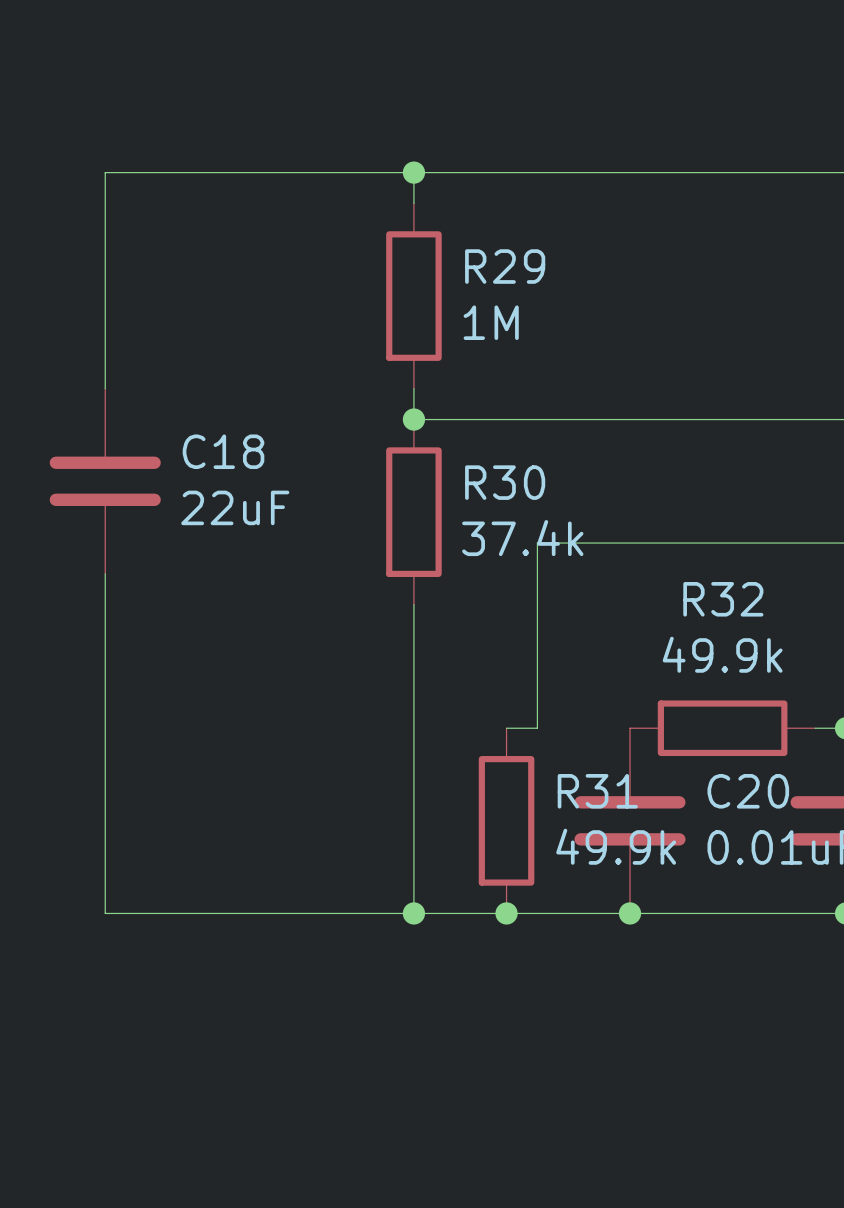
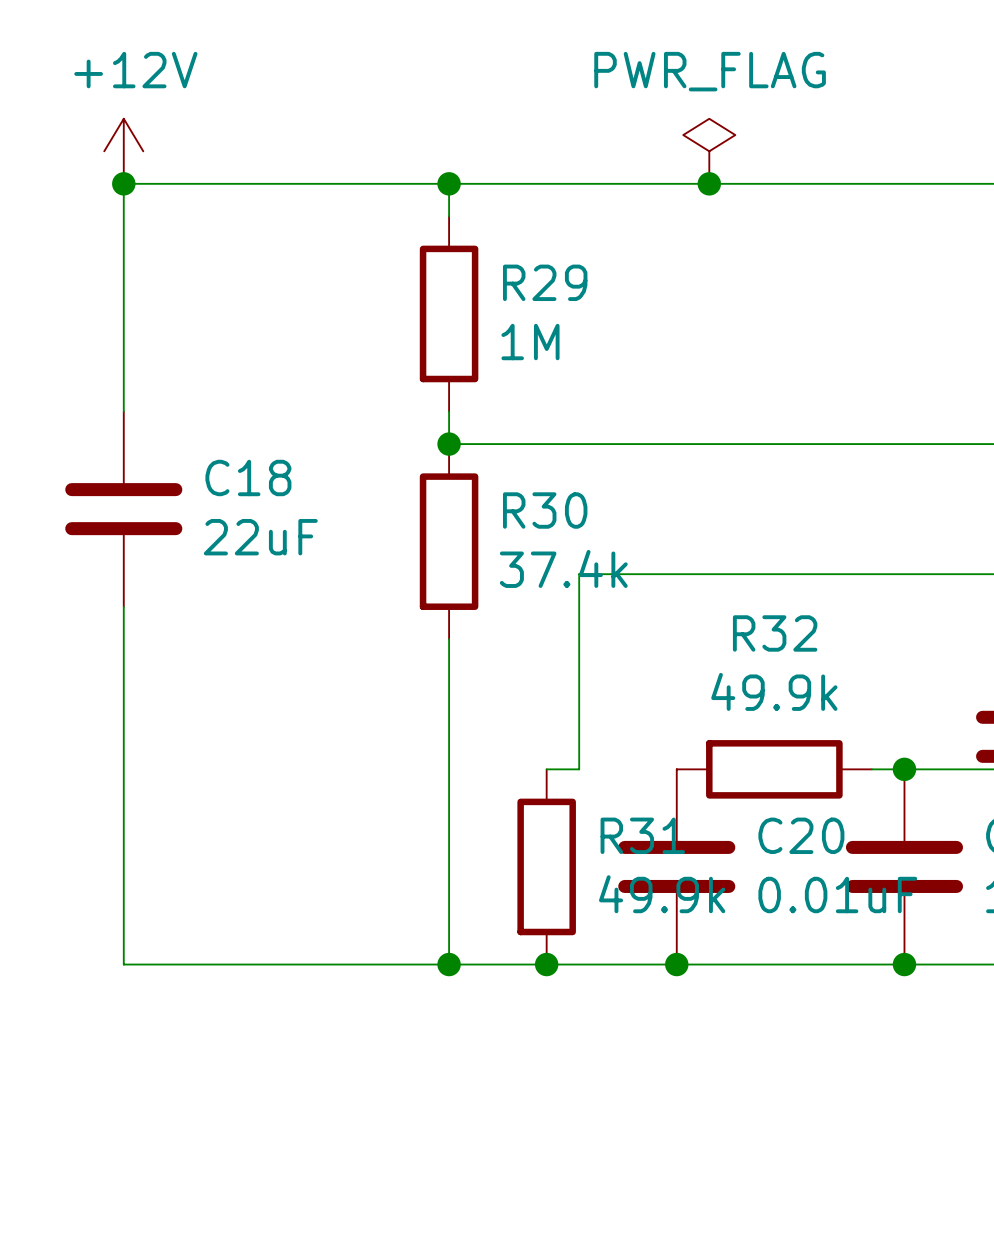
power symbol: none -> +12V (123, 151)
power symbol: none -> PWR_FLAG (709, 151)
junction: none -> (123, 183)
junction: none -> (709, 183)

